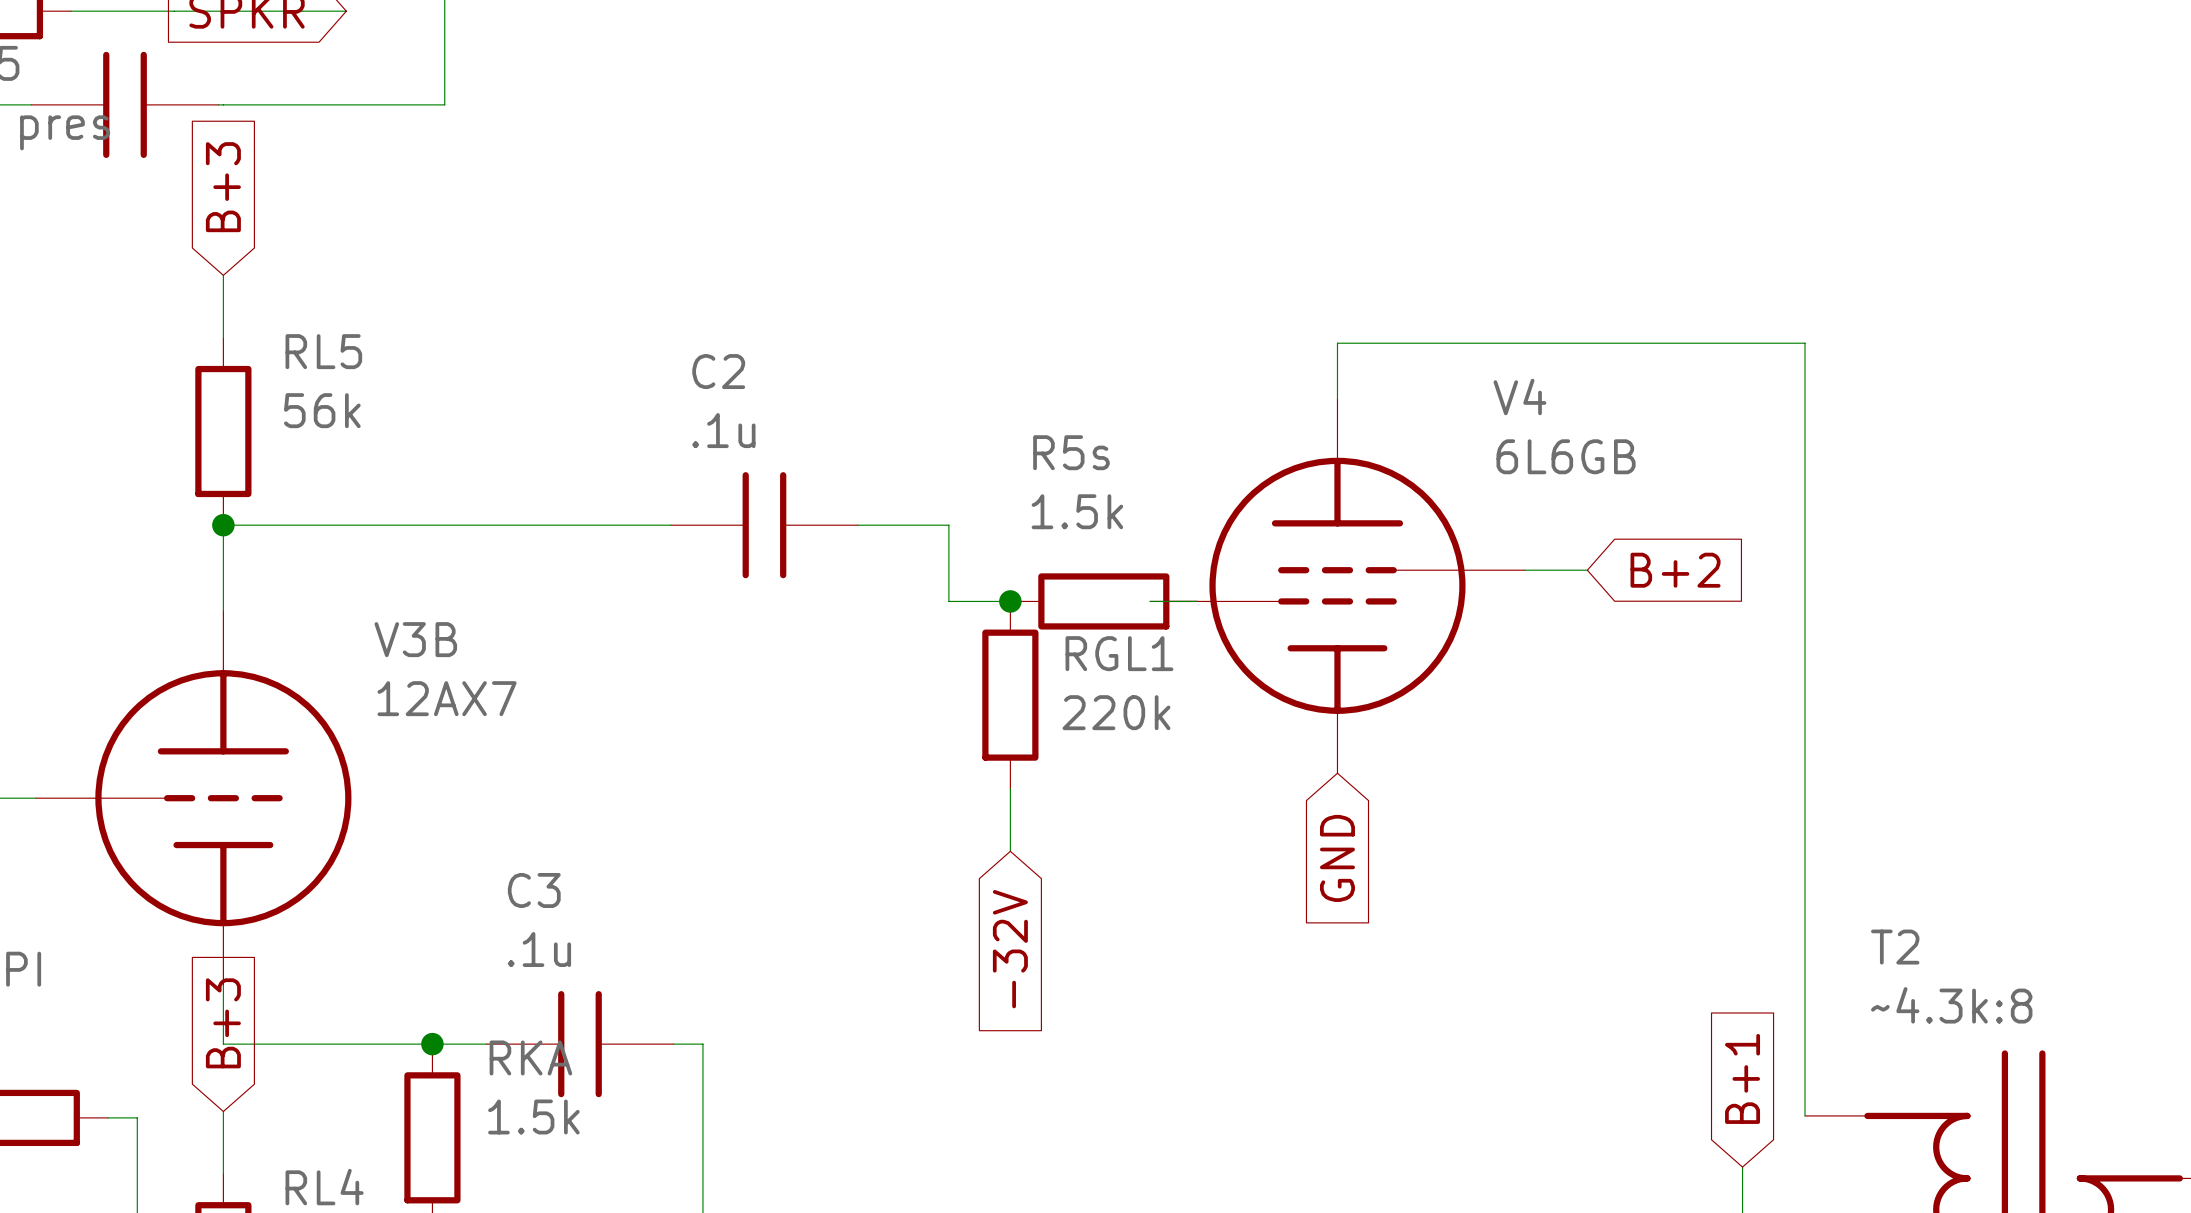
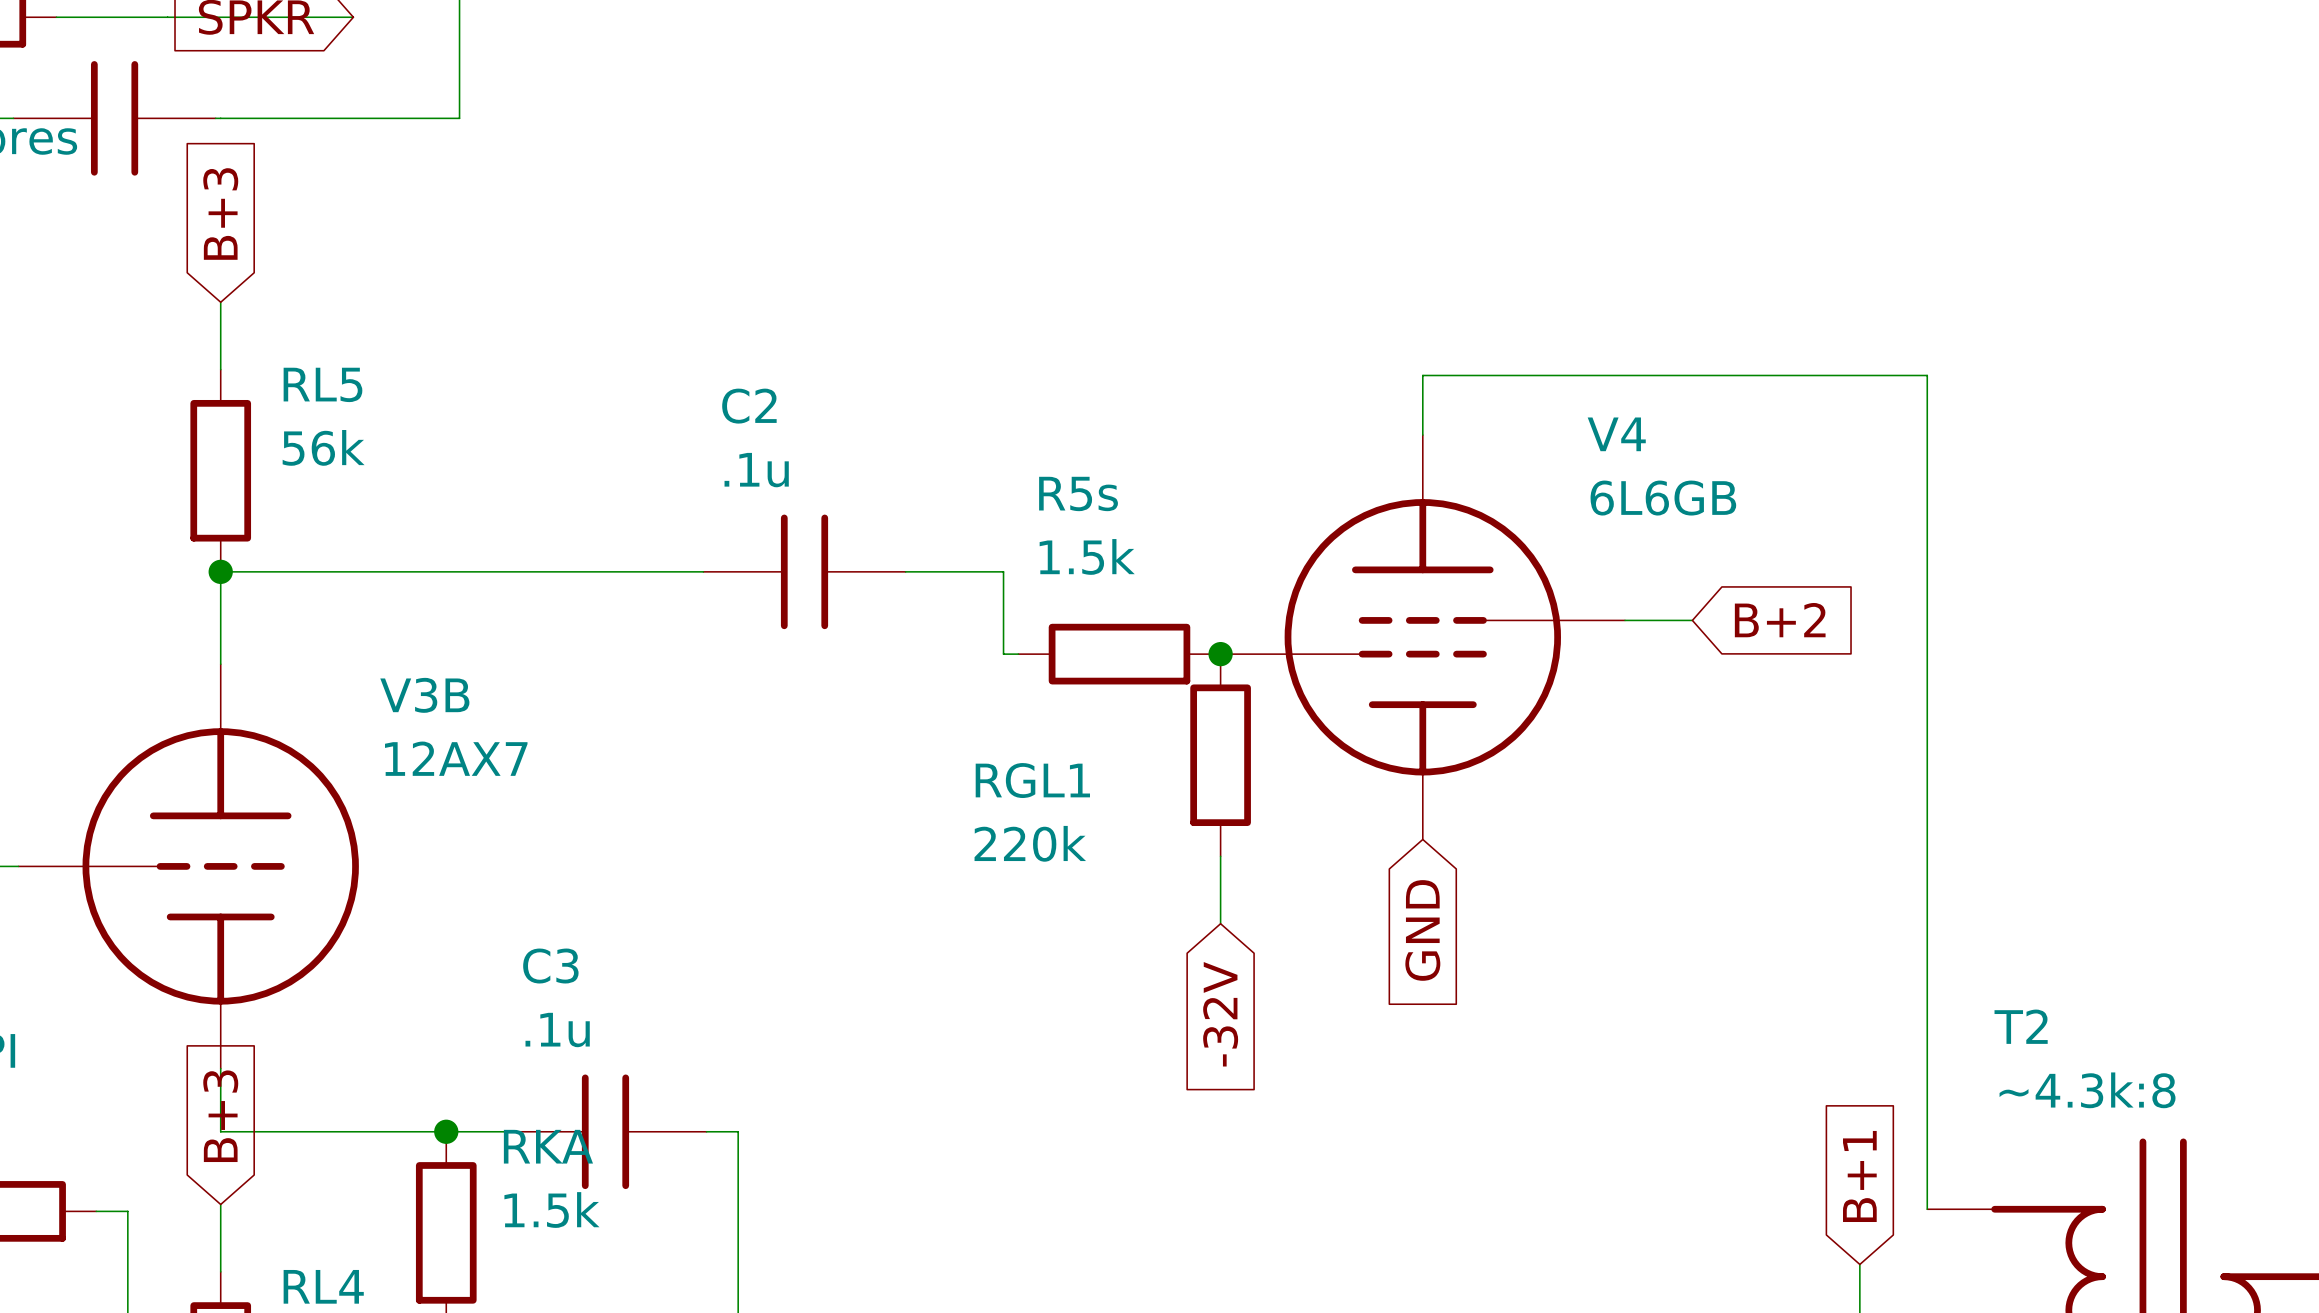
junction position: (1010, 601) -> (1220, 654)
R5s position: (1103, 601) -> (1119, 654)
RGL1 name position: RGL1 (1119, 653) -> RGL1 (1032, 780)
RGL1 position: (1010, 695) -> (1220, 755)
RGL1 value position: 220k (1116, 712) -> 220k (1030, 843)
wire: (1010, 788) (1010, 851) -> (1220, 856) (1220, 923)
global label position: -32V (1010, 949) -> -32V (1220, 1014)

